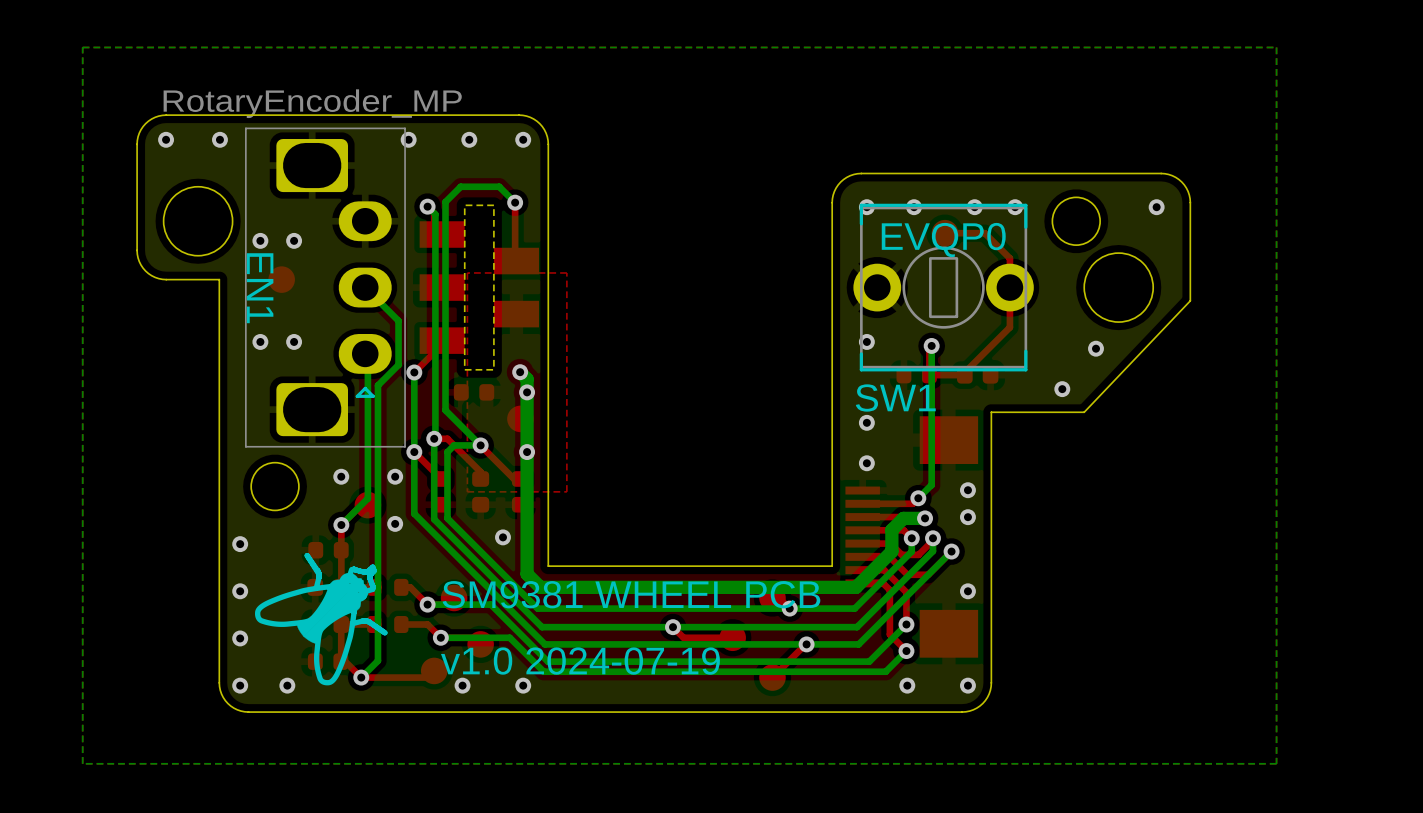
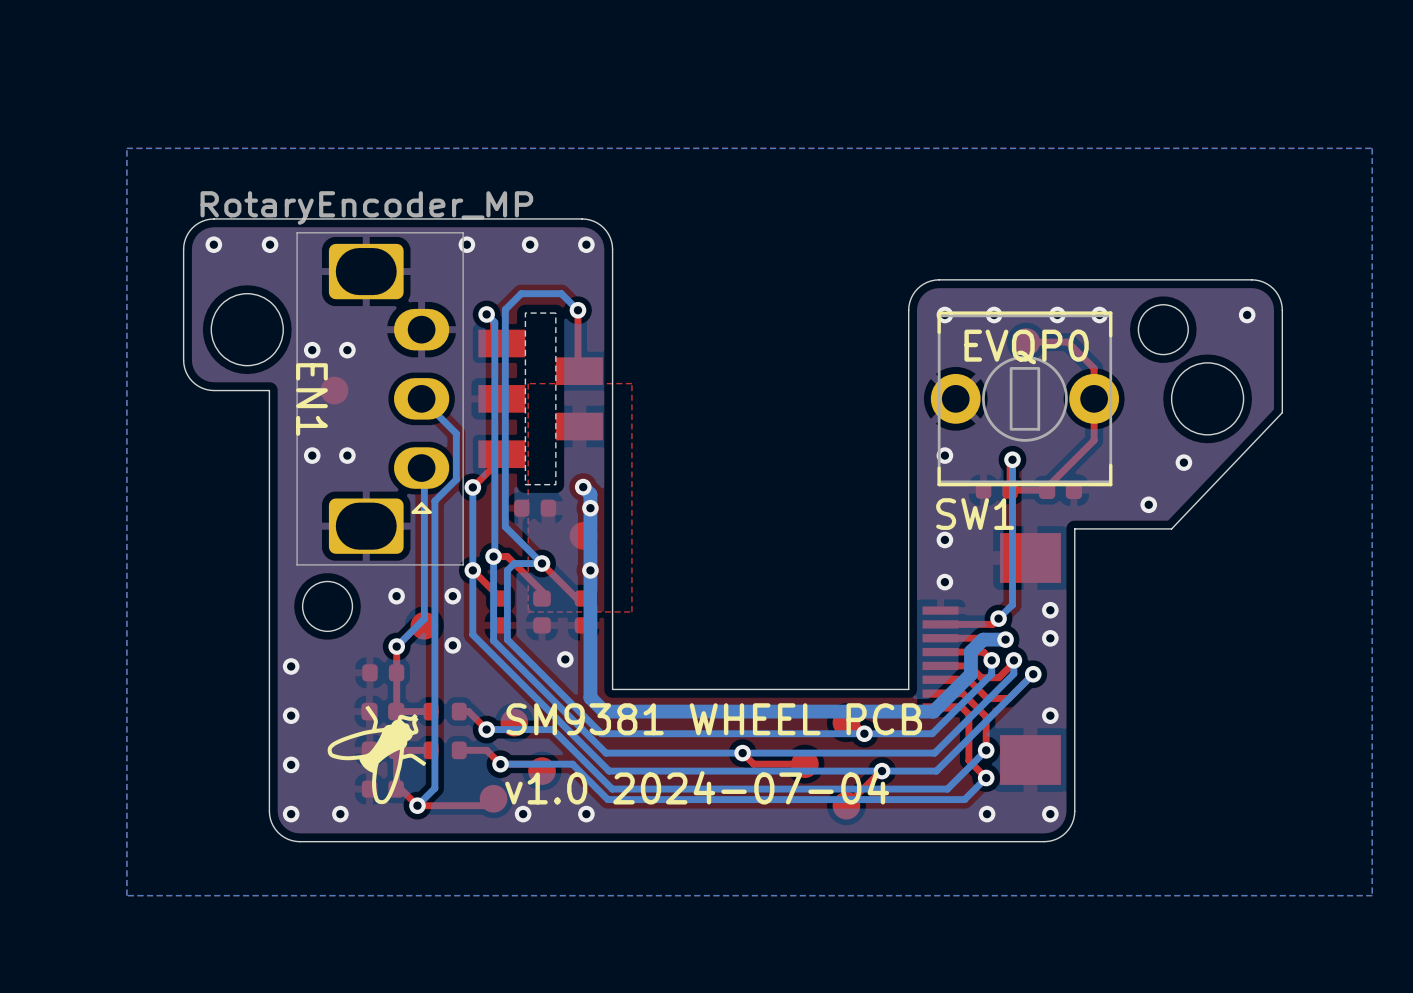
drawing shape: [255, 552, 388, 686] -> [327, 705, 427, 805]
text: v1.0 2024-07-19 (580, 661) -> v1.0 2024-07-04 (697, 787)

